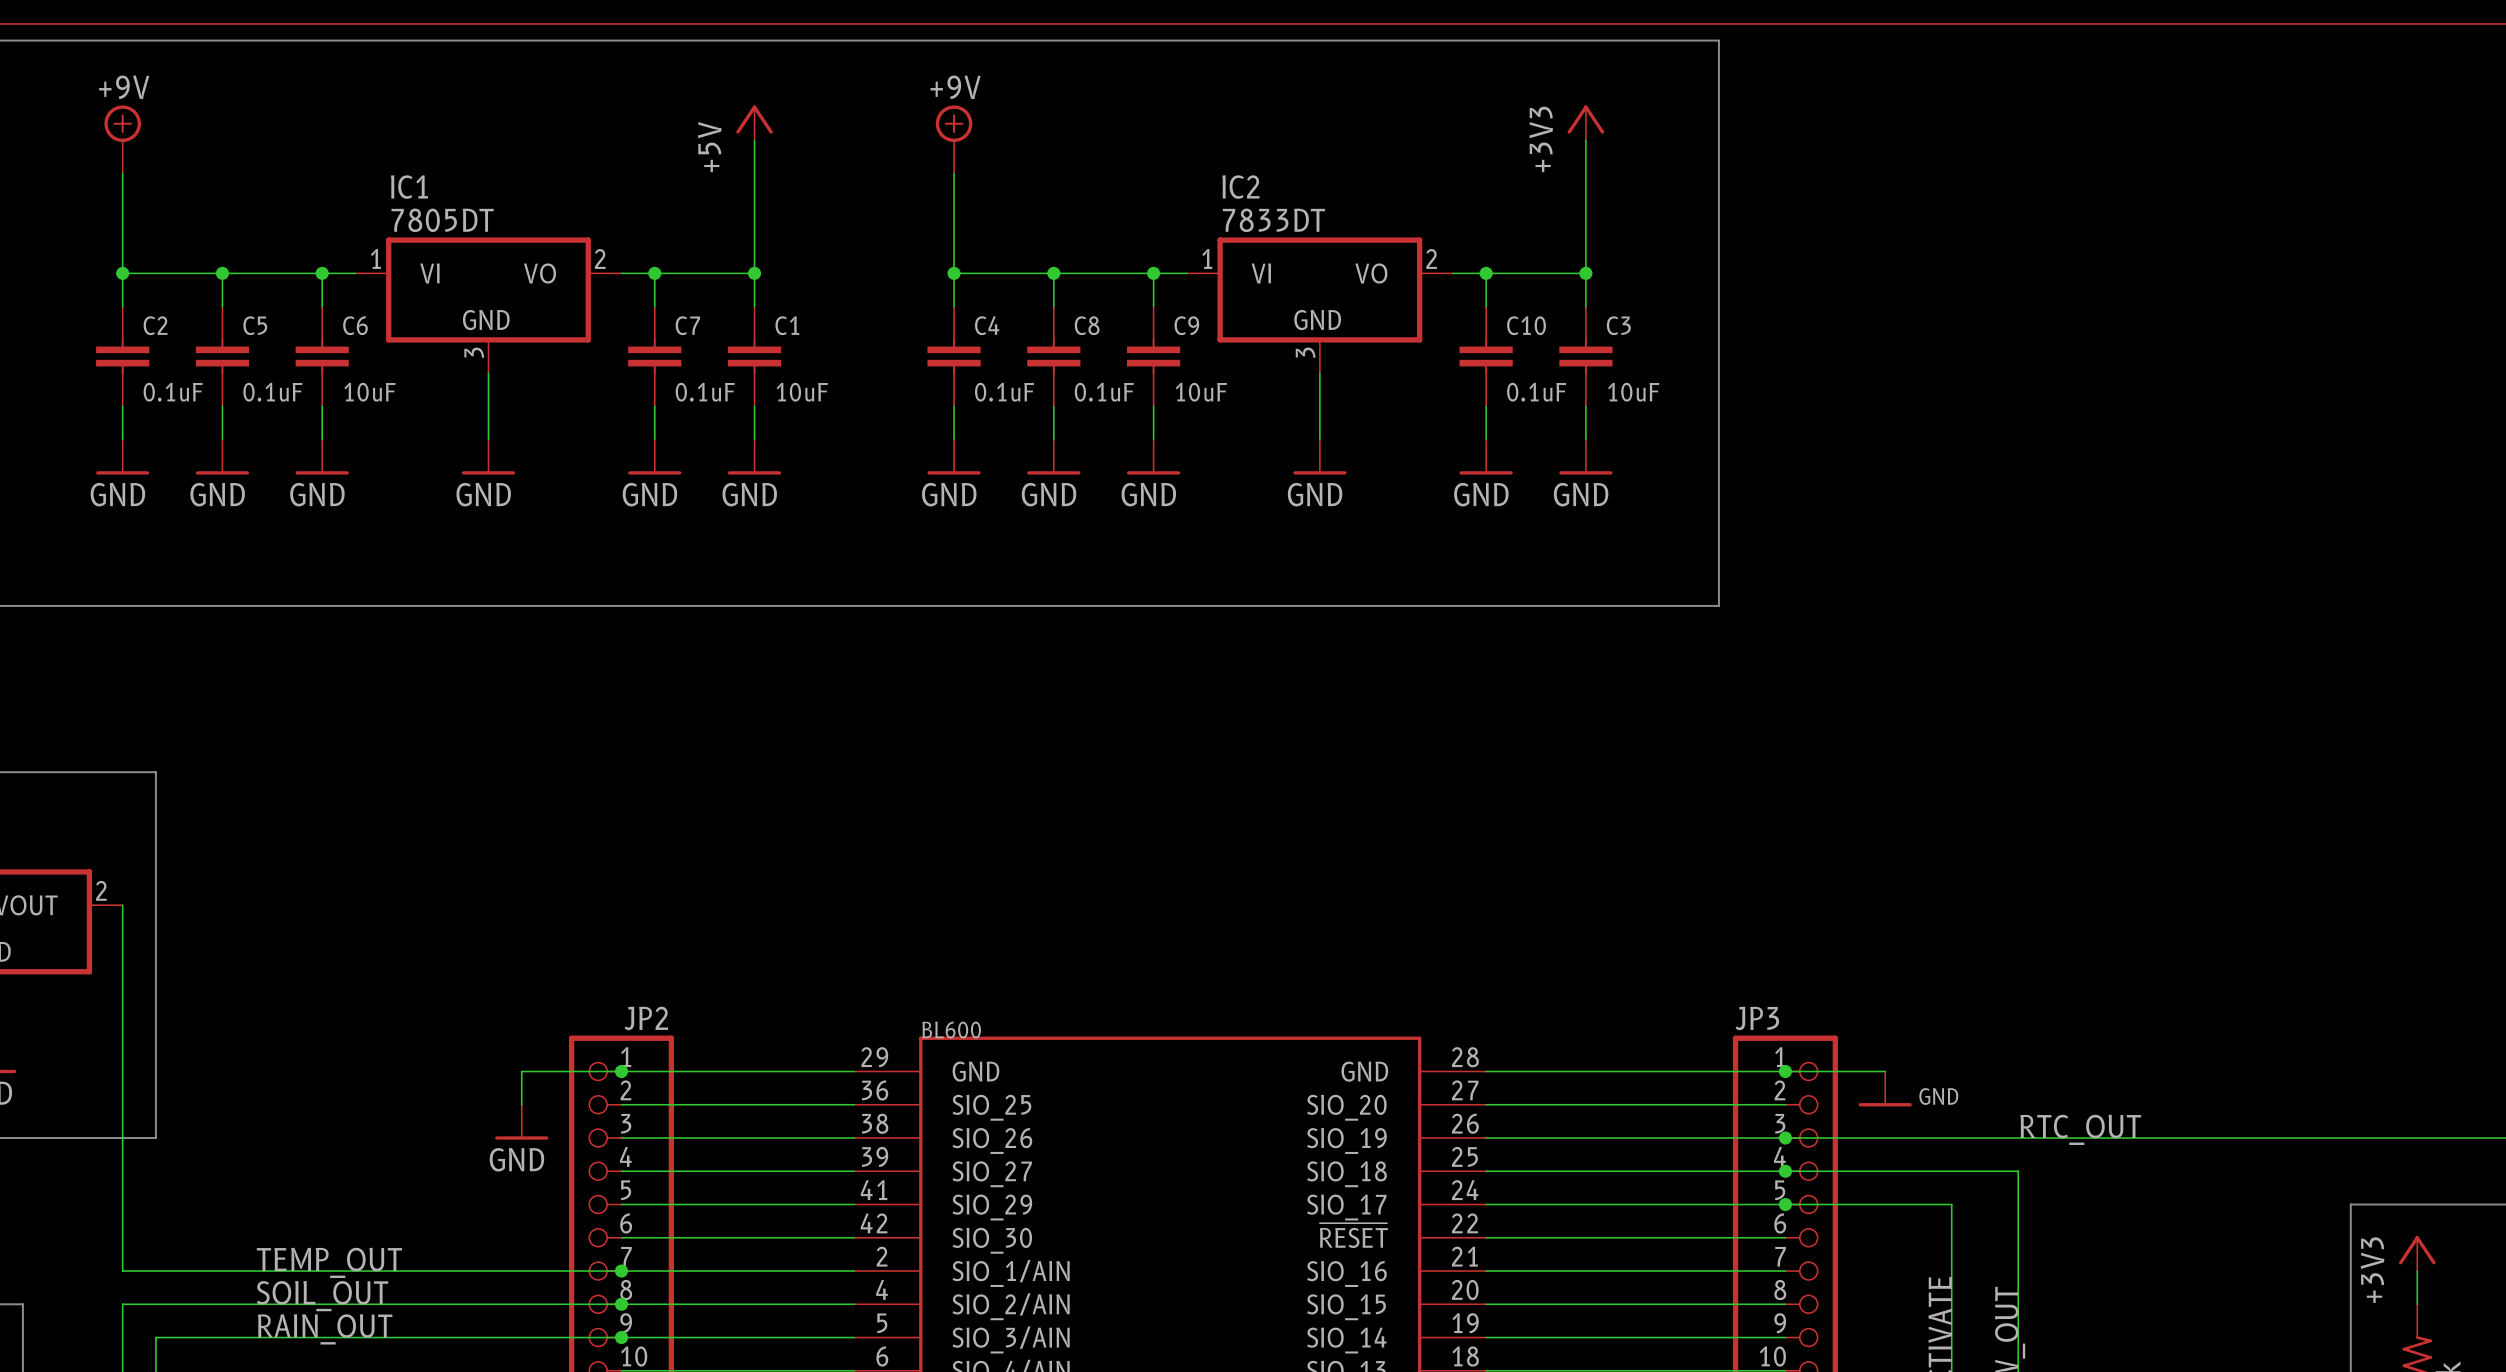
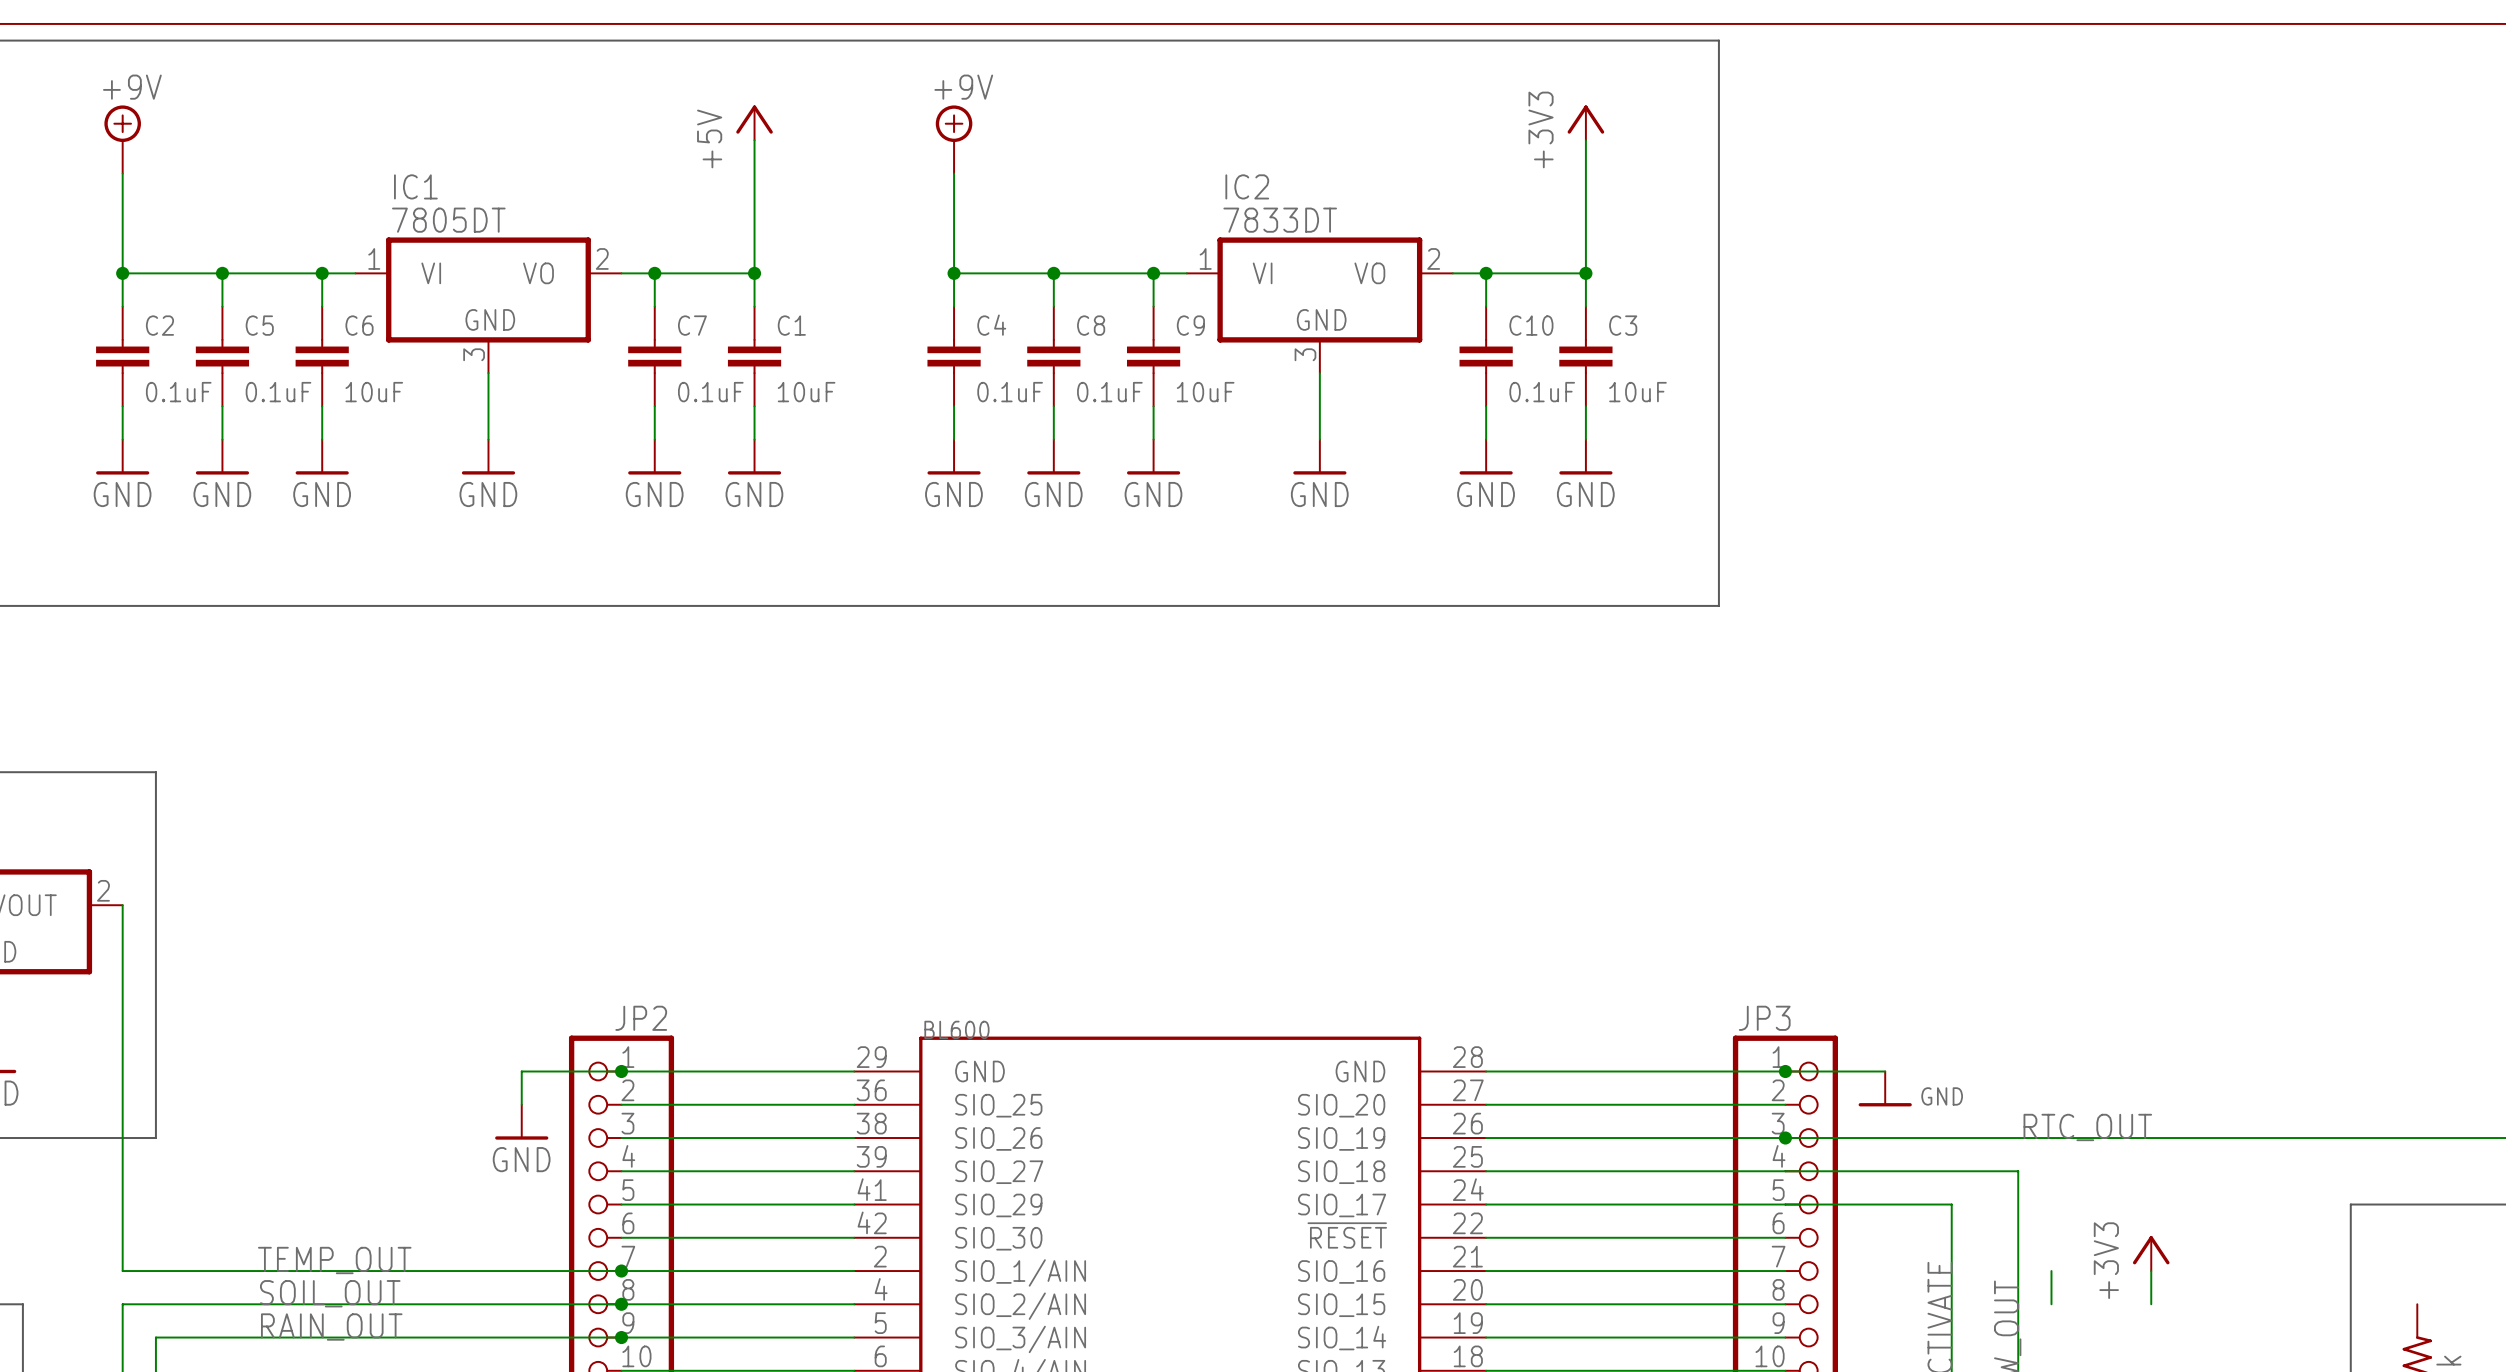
junction: (1785, 1171) -> none
junction: (1785, 1204) -> none
power symbol: none -> +3V3 (2151, 1253)
power symbol: +3V3 (2417, 1253) -> none
wire: none -> (2051, 1271) (2051, 1304)
wire: (2417, 1271) (2417, 1304) -> (2151, 1271) (2151, 1304)

